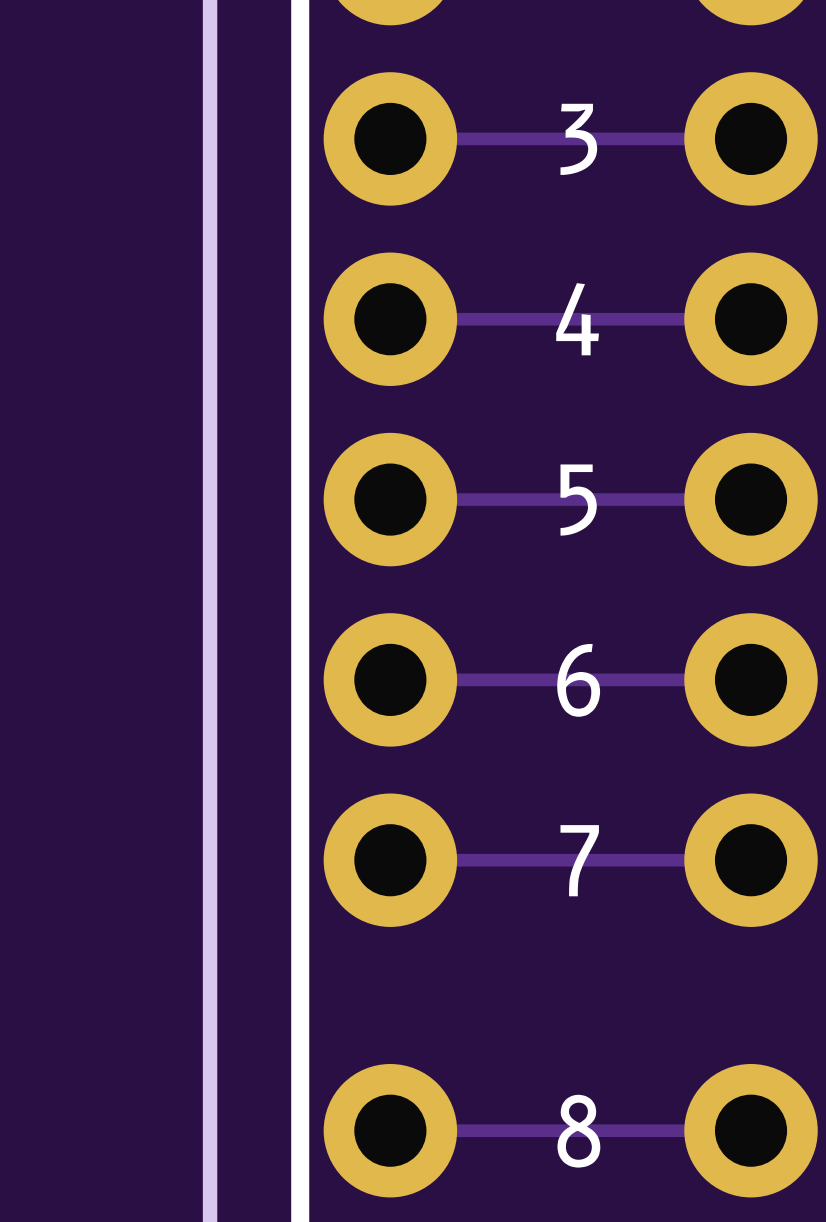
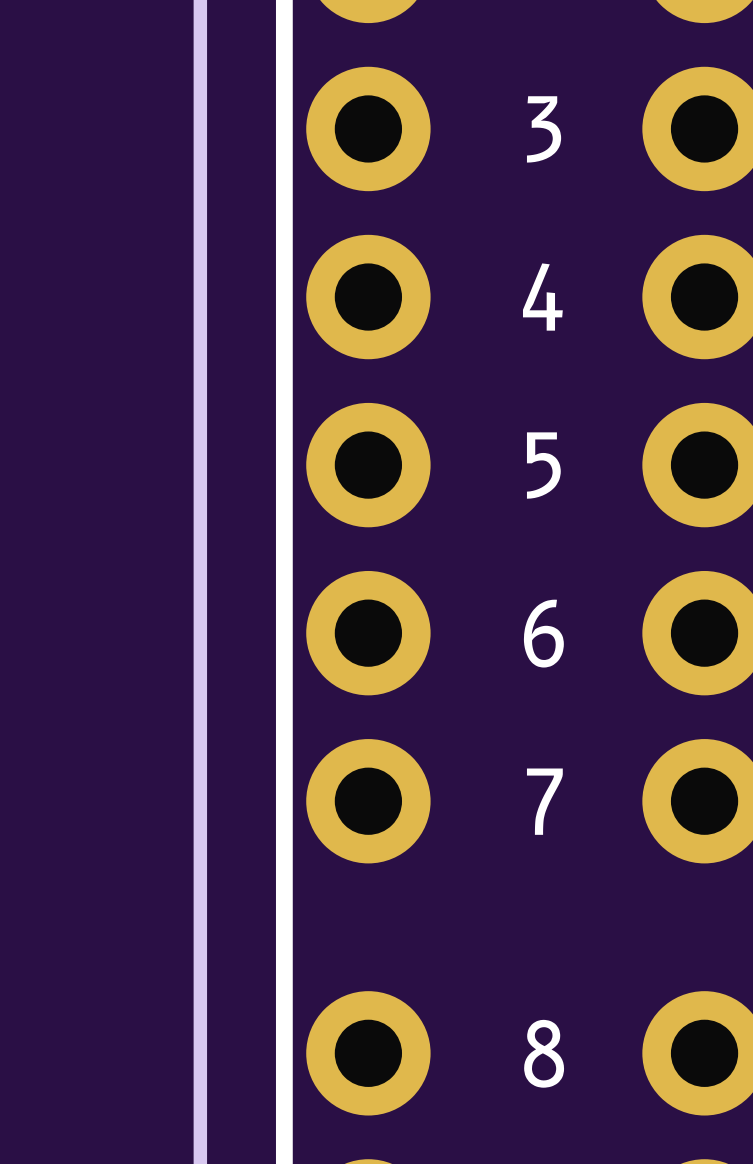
track: (390, 138) (751, 138) -> none
track: (390, 319) (751, 319) -> none
track: (390, 499) (751, 499) -> none
track: (390, 679) (751, 679) -> none
track: (390, 860) (751, 860) -> none
track: (390, 1130) (751, 1130) -> none

